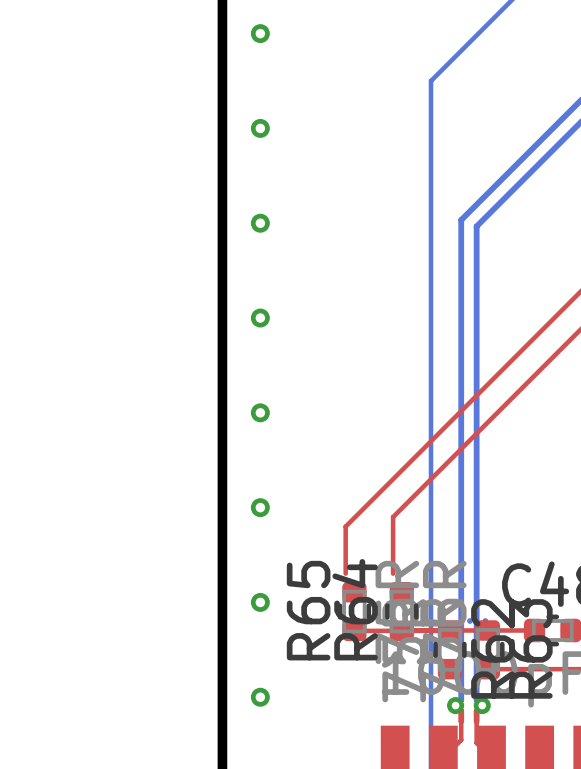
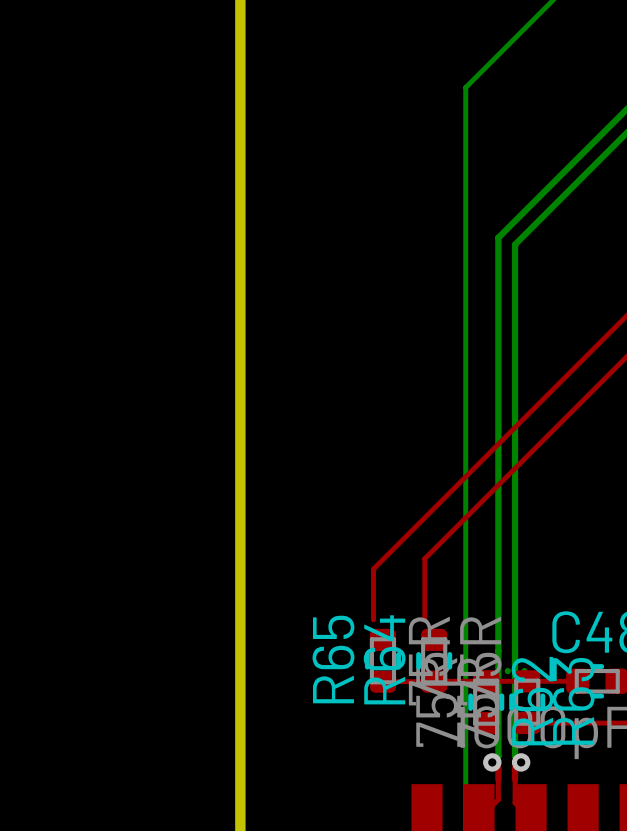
via: (260, 33) -> none
via: (260, 128) -> none
via: (260, 223) -> none
via: (260, 318) -> none
via: (260, 412) -> none
via: (260, 507) -> none
via: (260, 602) -> none
via: (260, 697) -> none

